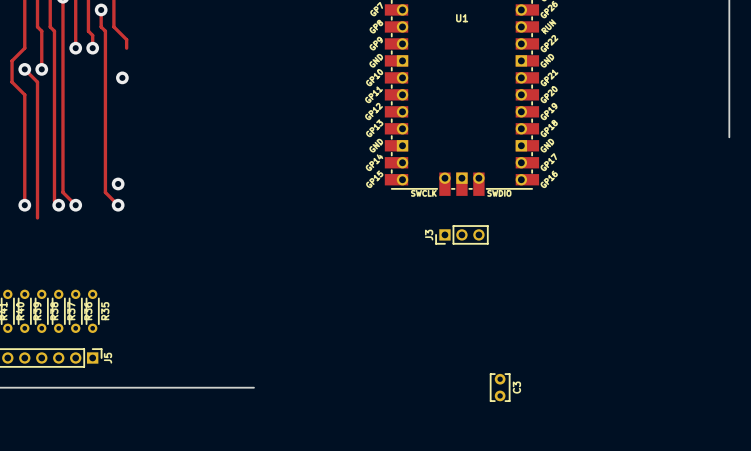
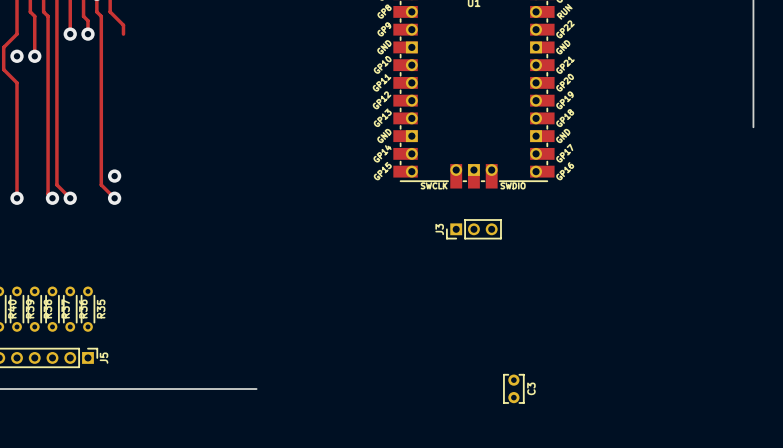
track: (24, 69) (37, 82) (37, 217) -> none
via: (122, 77) -> none

